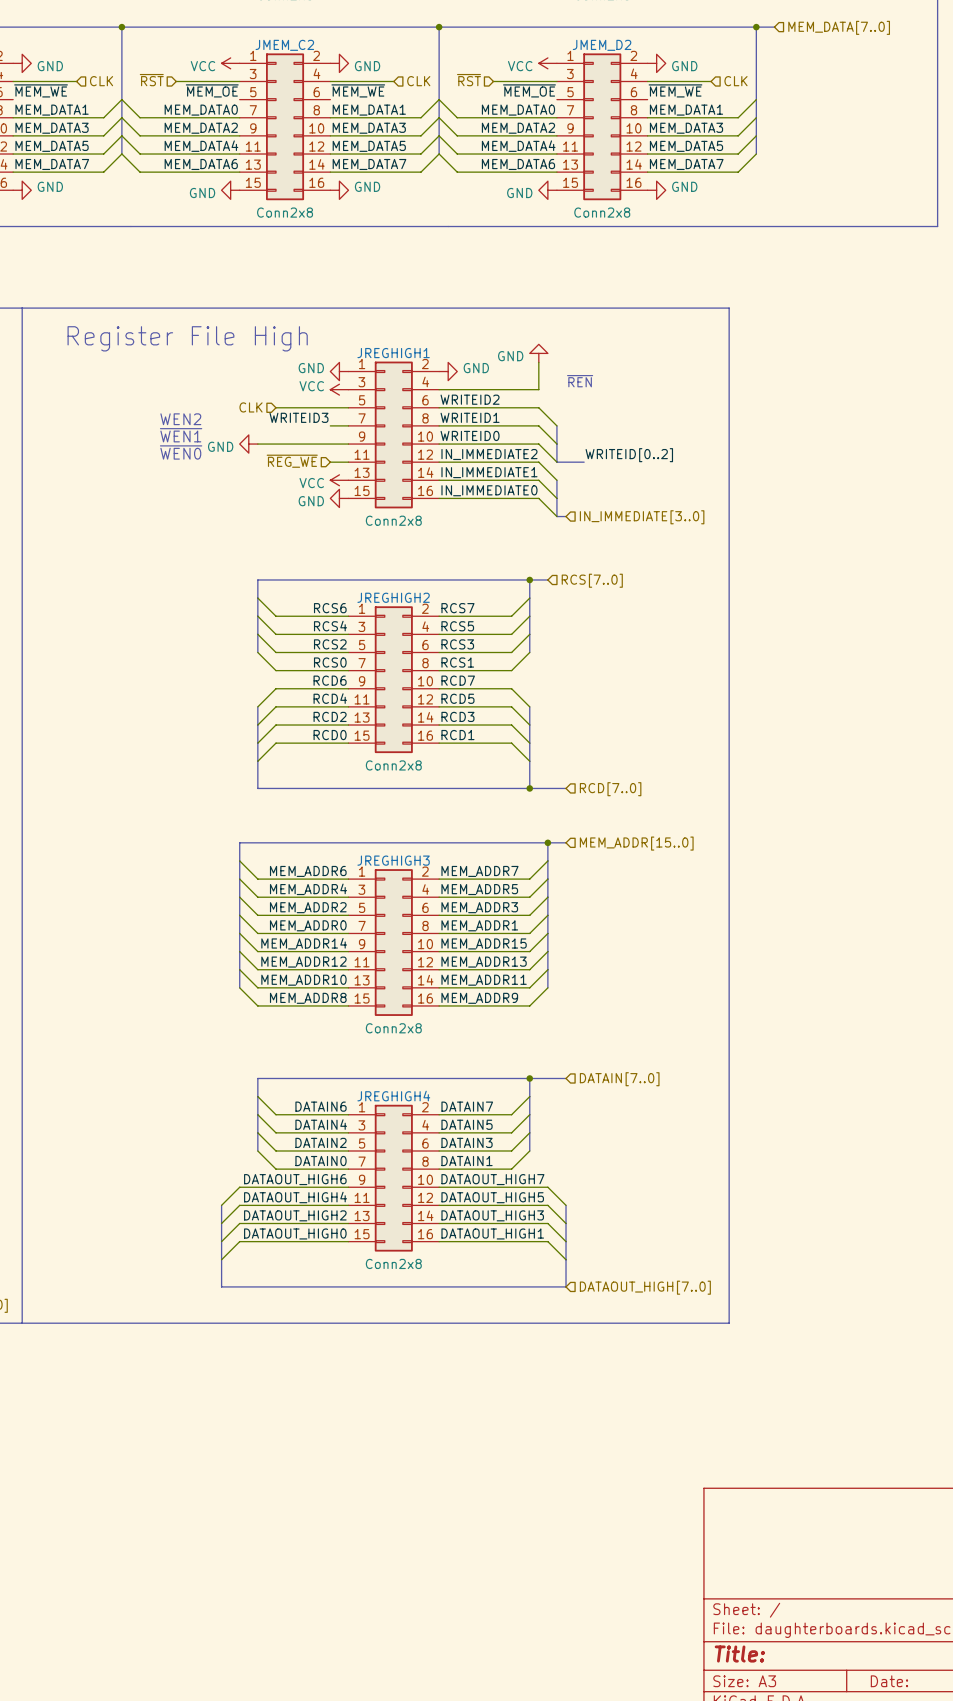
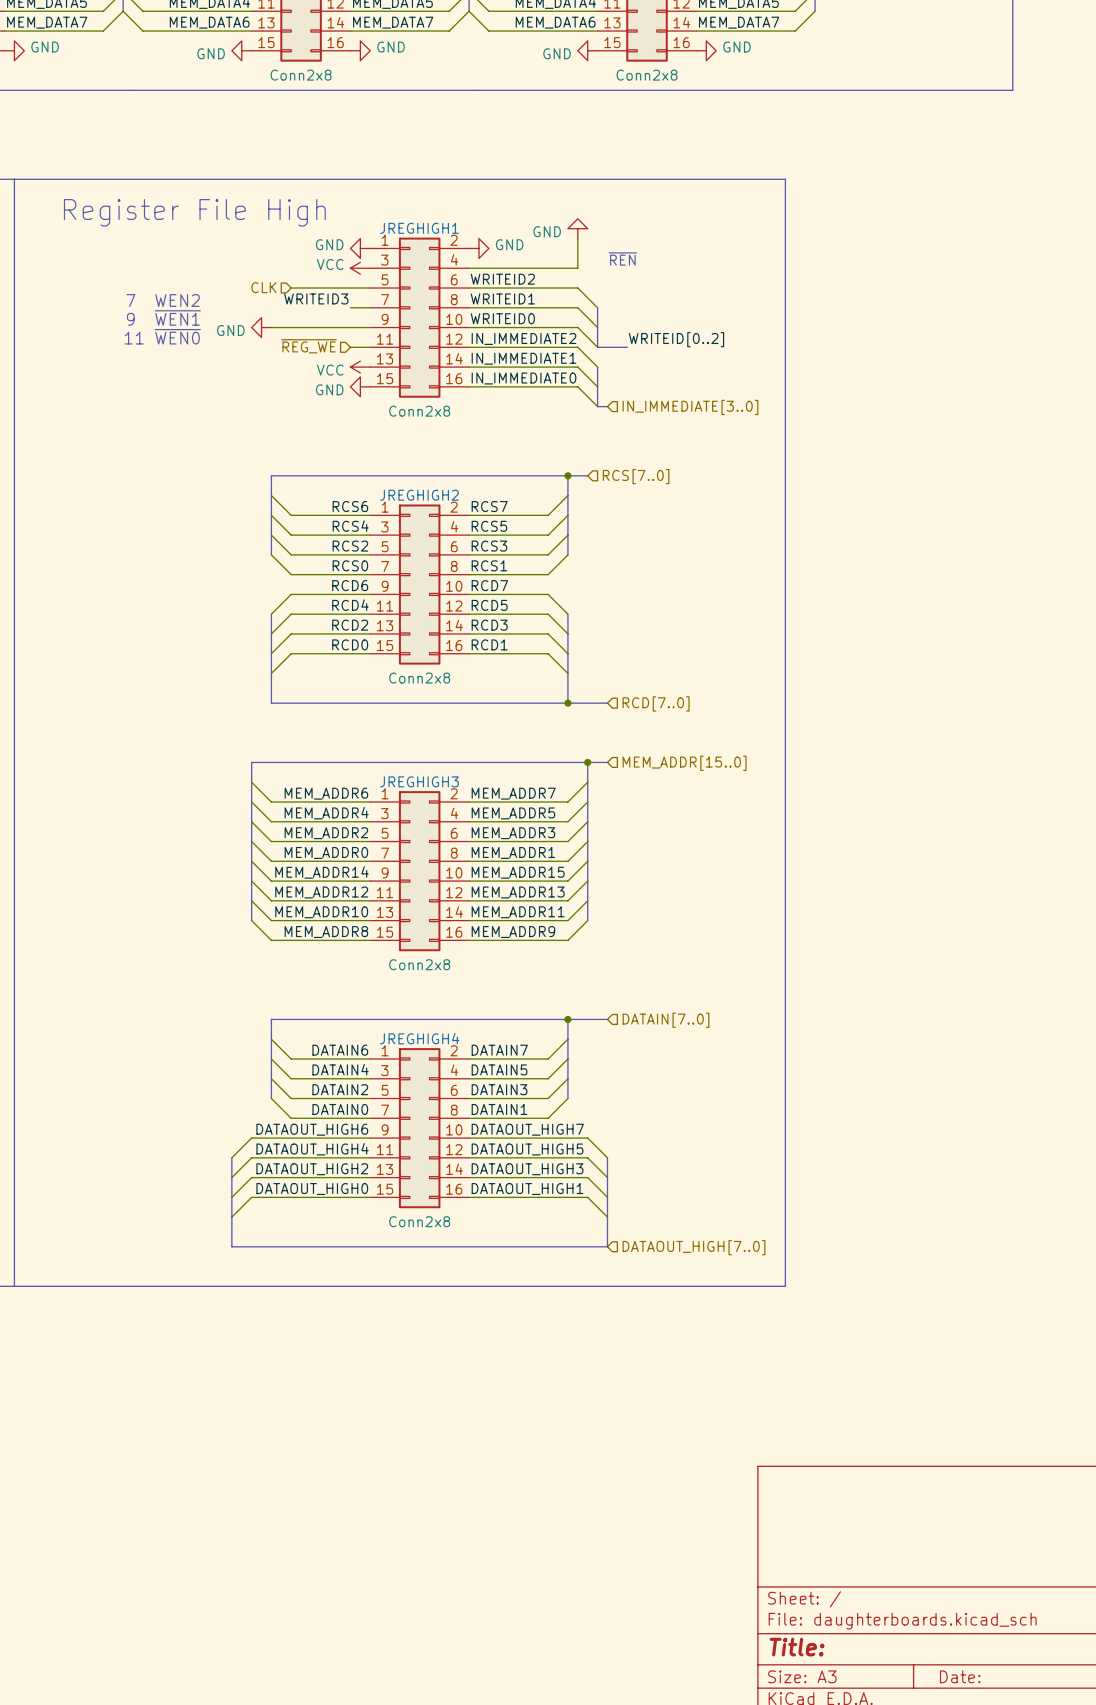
text: WEN2 (180, 419) -> 7 WEN2 (163, 300)
text: ~{WEN1} (181, 435) -> 9 ~{WEN1} (163, 317)
text: ~{WEN0} (181, 452) -> 11 ~{WEN0} (162, 336)

